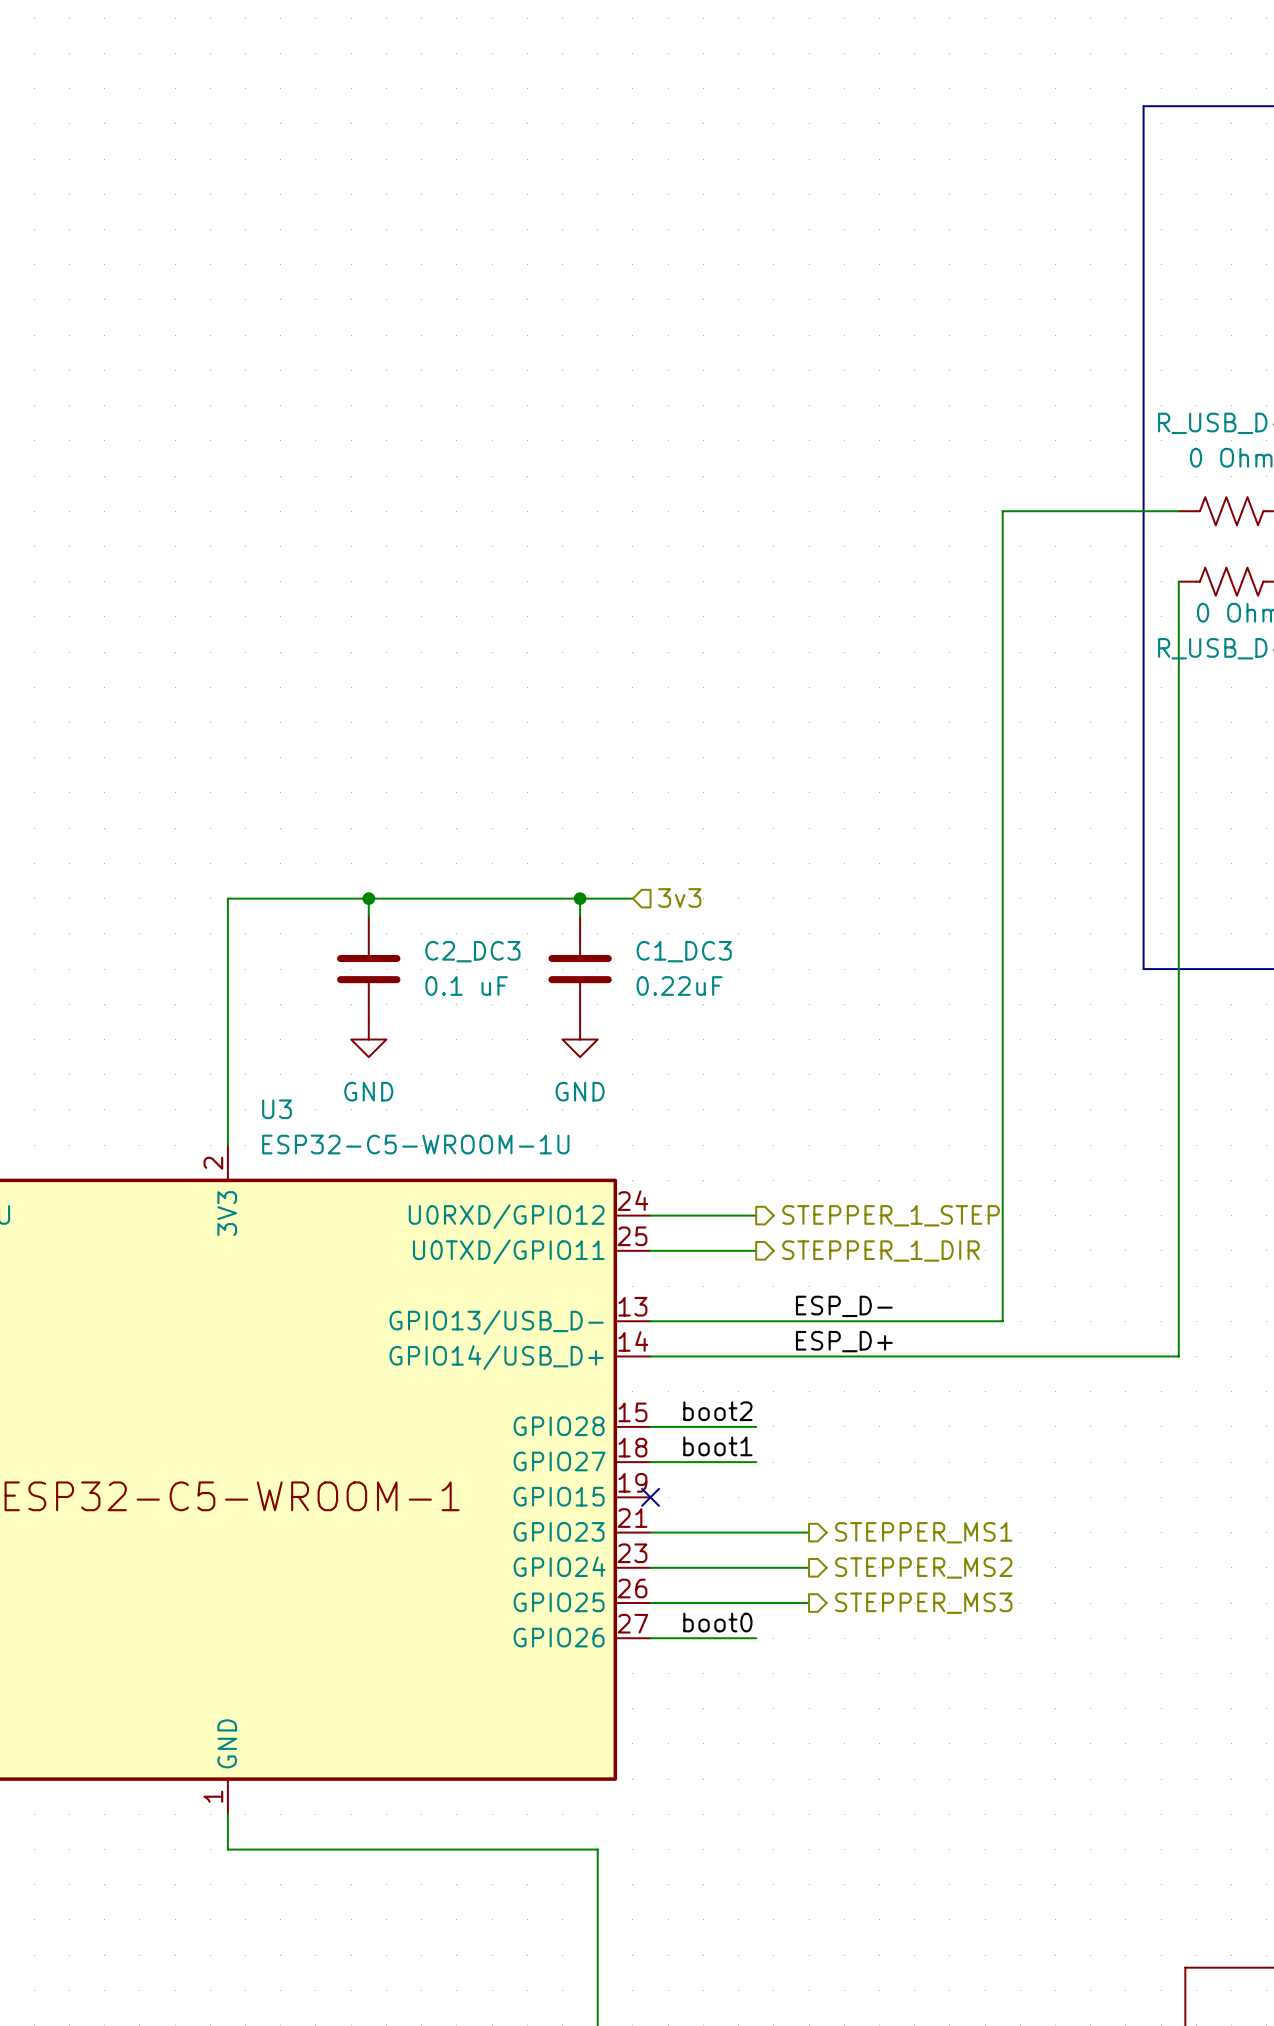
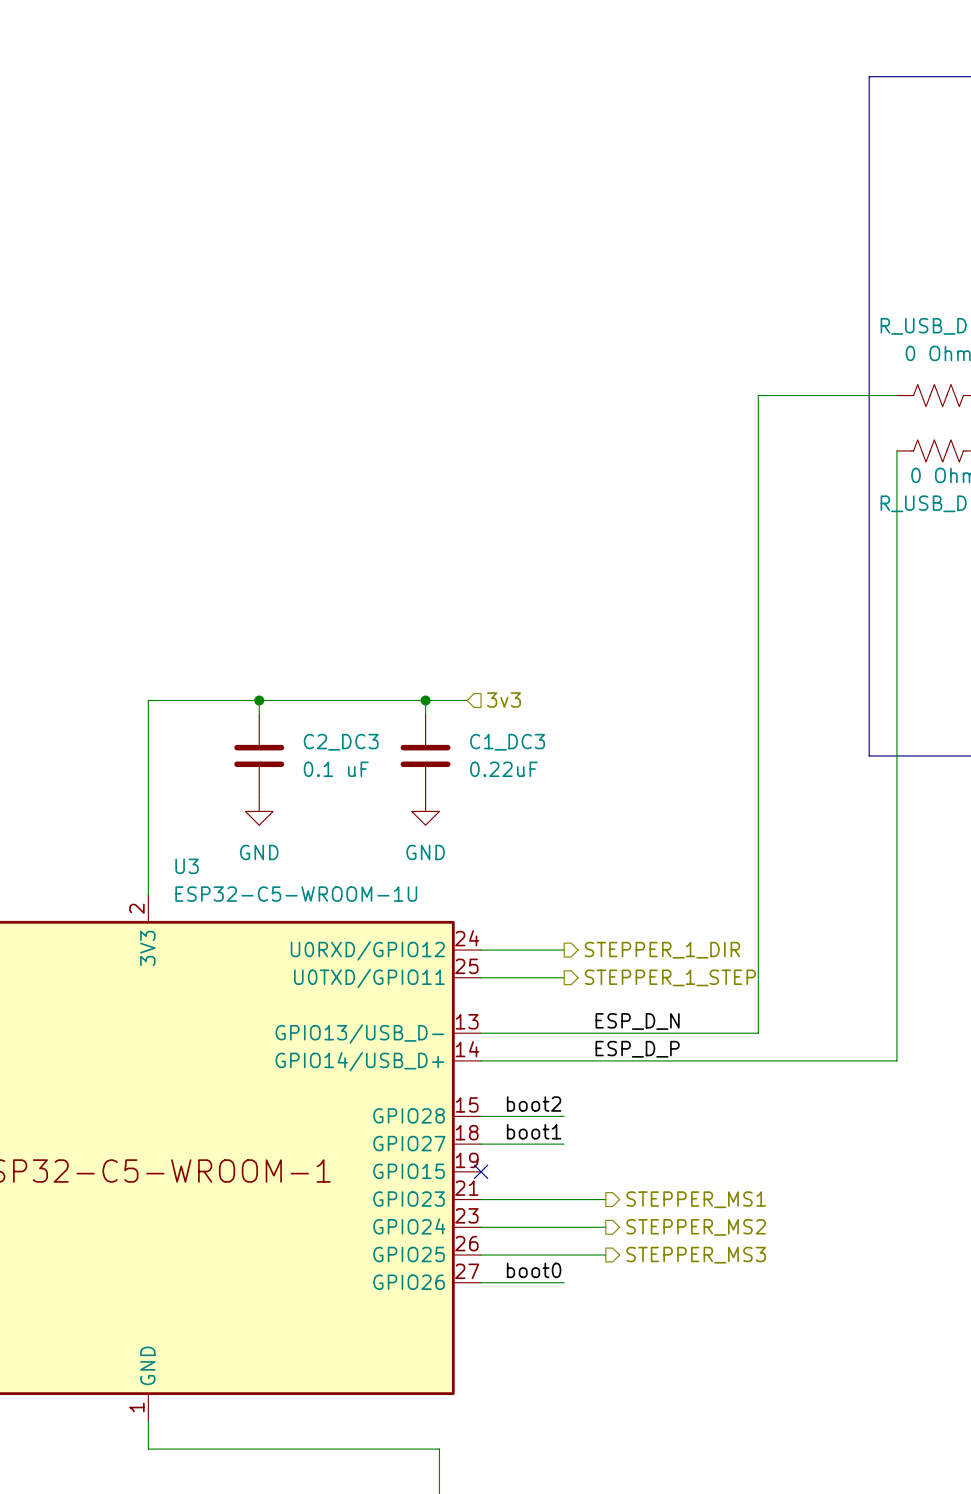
hierarchical label: STEPPER_1_STEP (891, 1215) -> STEPPER_1_DIR (662, 950)
hierarchical label: STEPPER_1_DIR (880, 1251) -> STEPPER_1_STEP (670, 977)
label: ESP_D- (844, 1306) -> ESP_D_N (637, 1021)
label: ESP_D+ (844, 1341) -> ESP_D_P (637, 1049)

